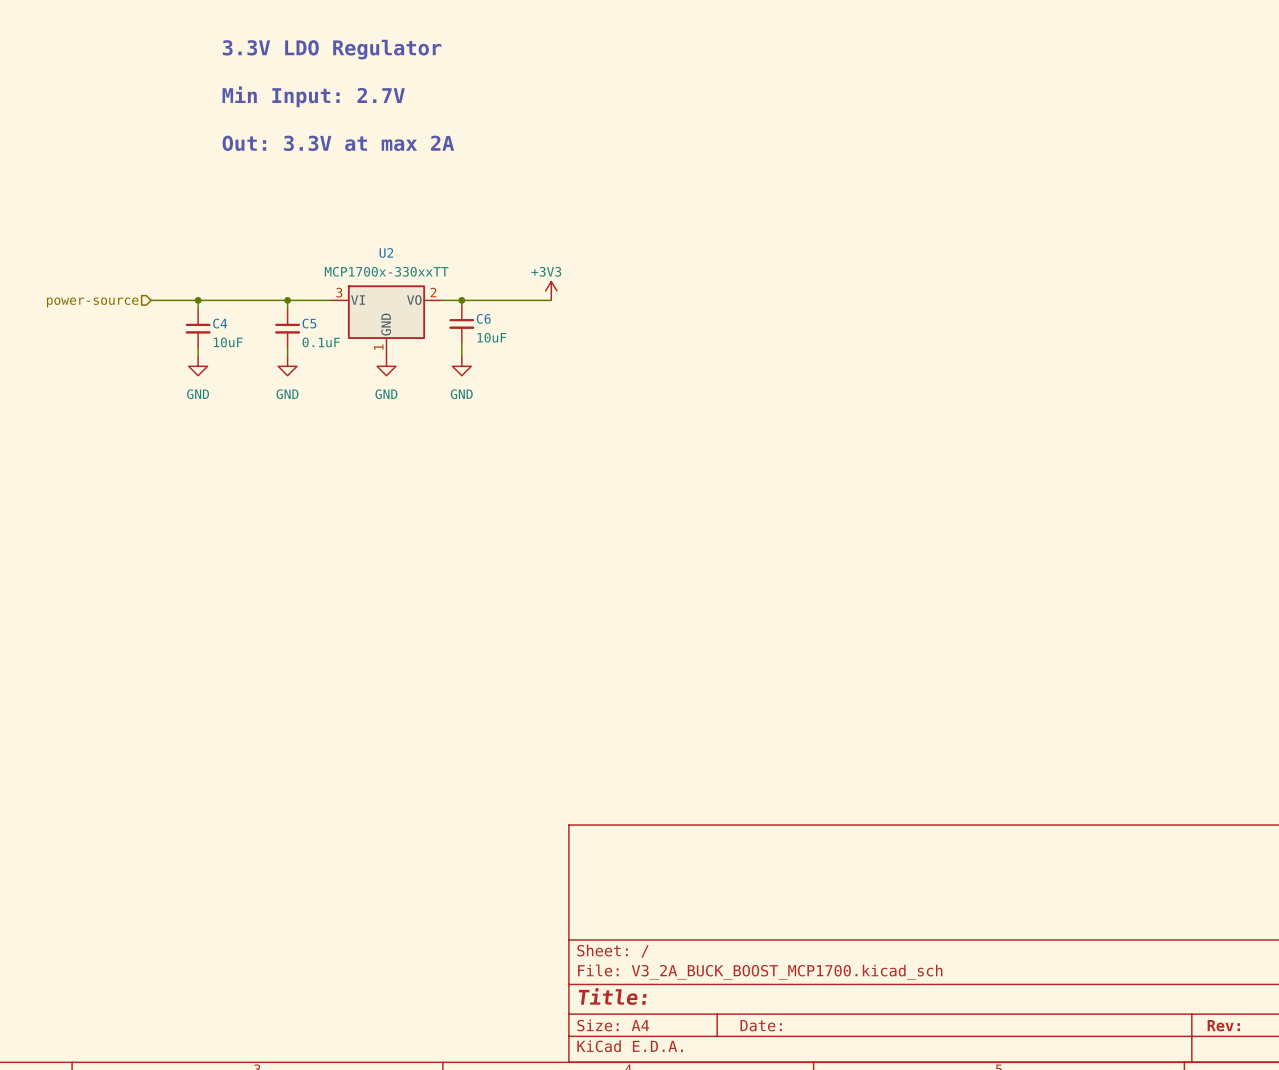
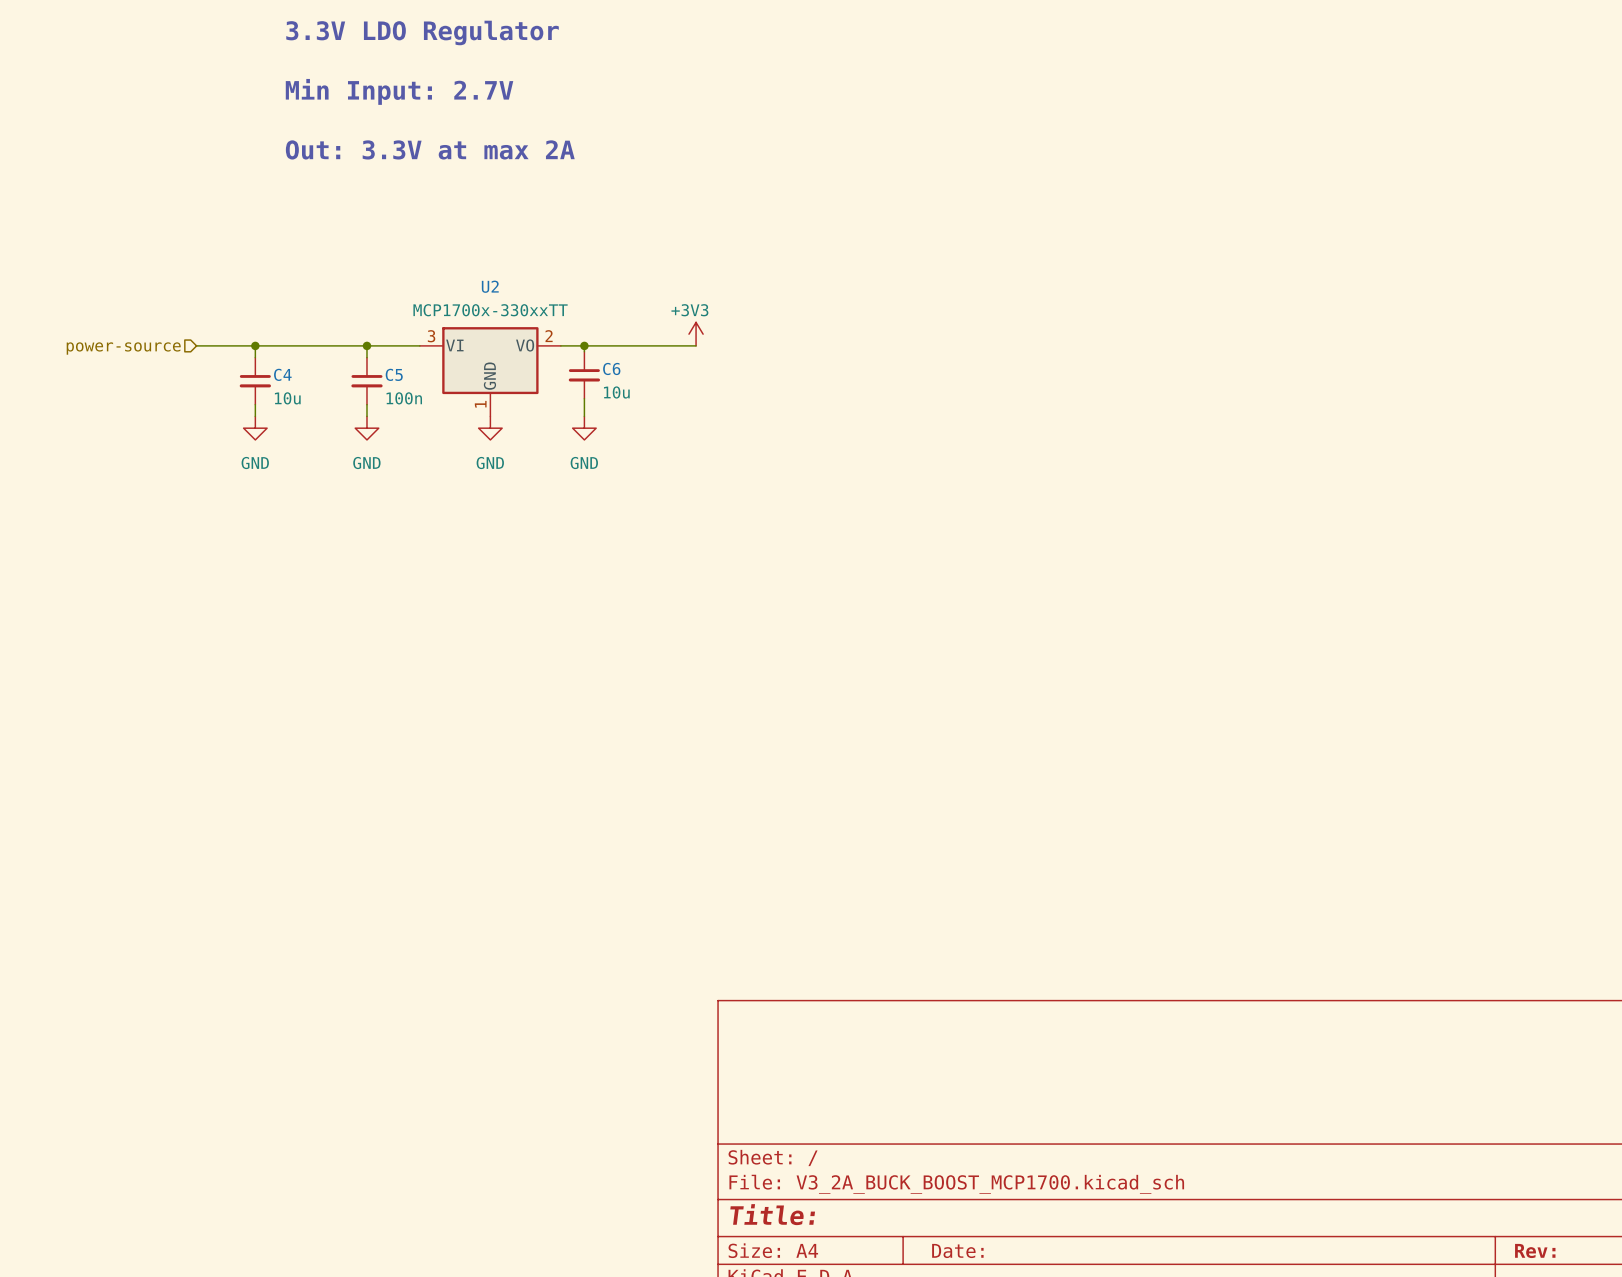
C6 value: 10uF (491, 337) -> 10u (616, 392)
C4 value: 10uF (228, 342) -> 10u (287, 398)
C5 value: 0.1uF (321, 342) -> 100n (404, 398)

